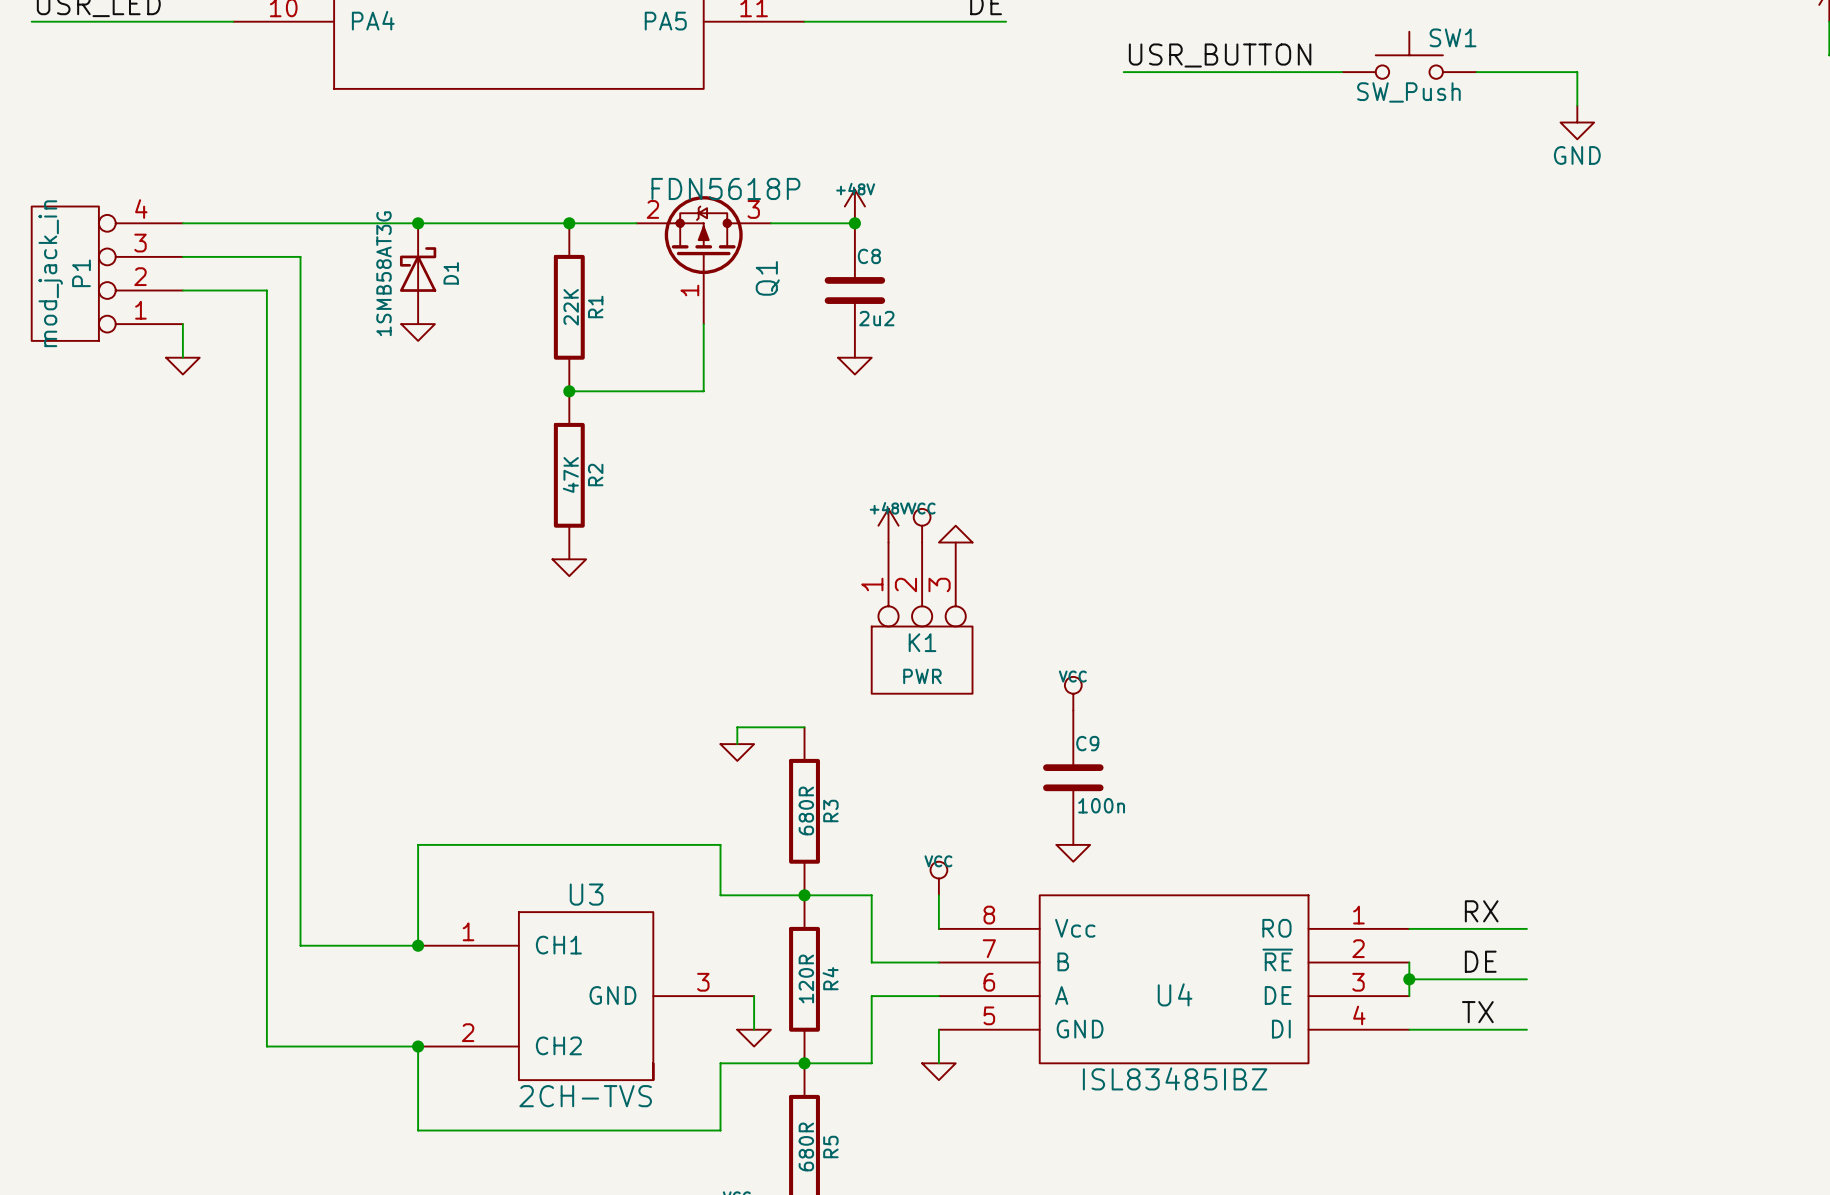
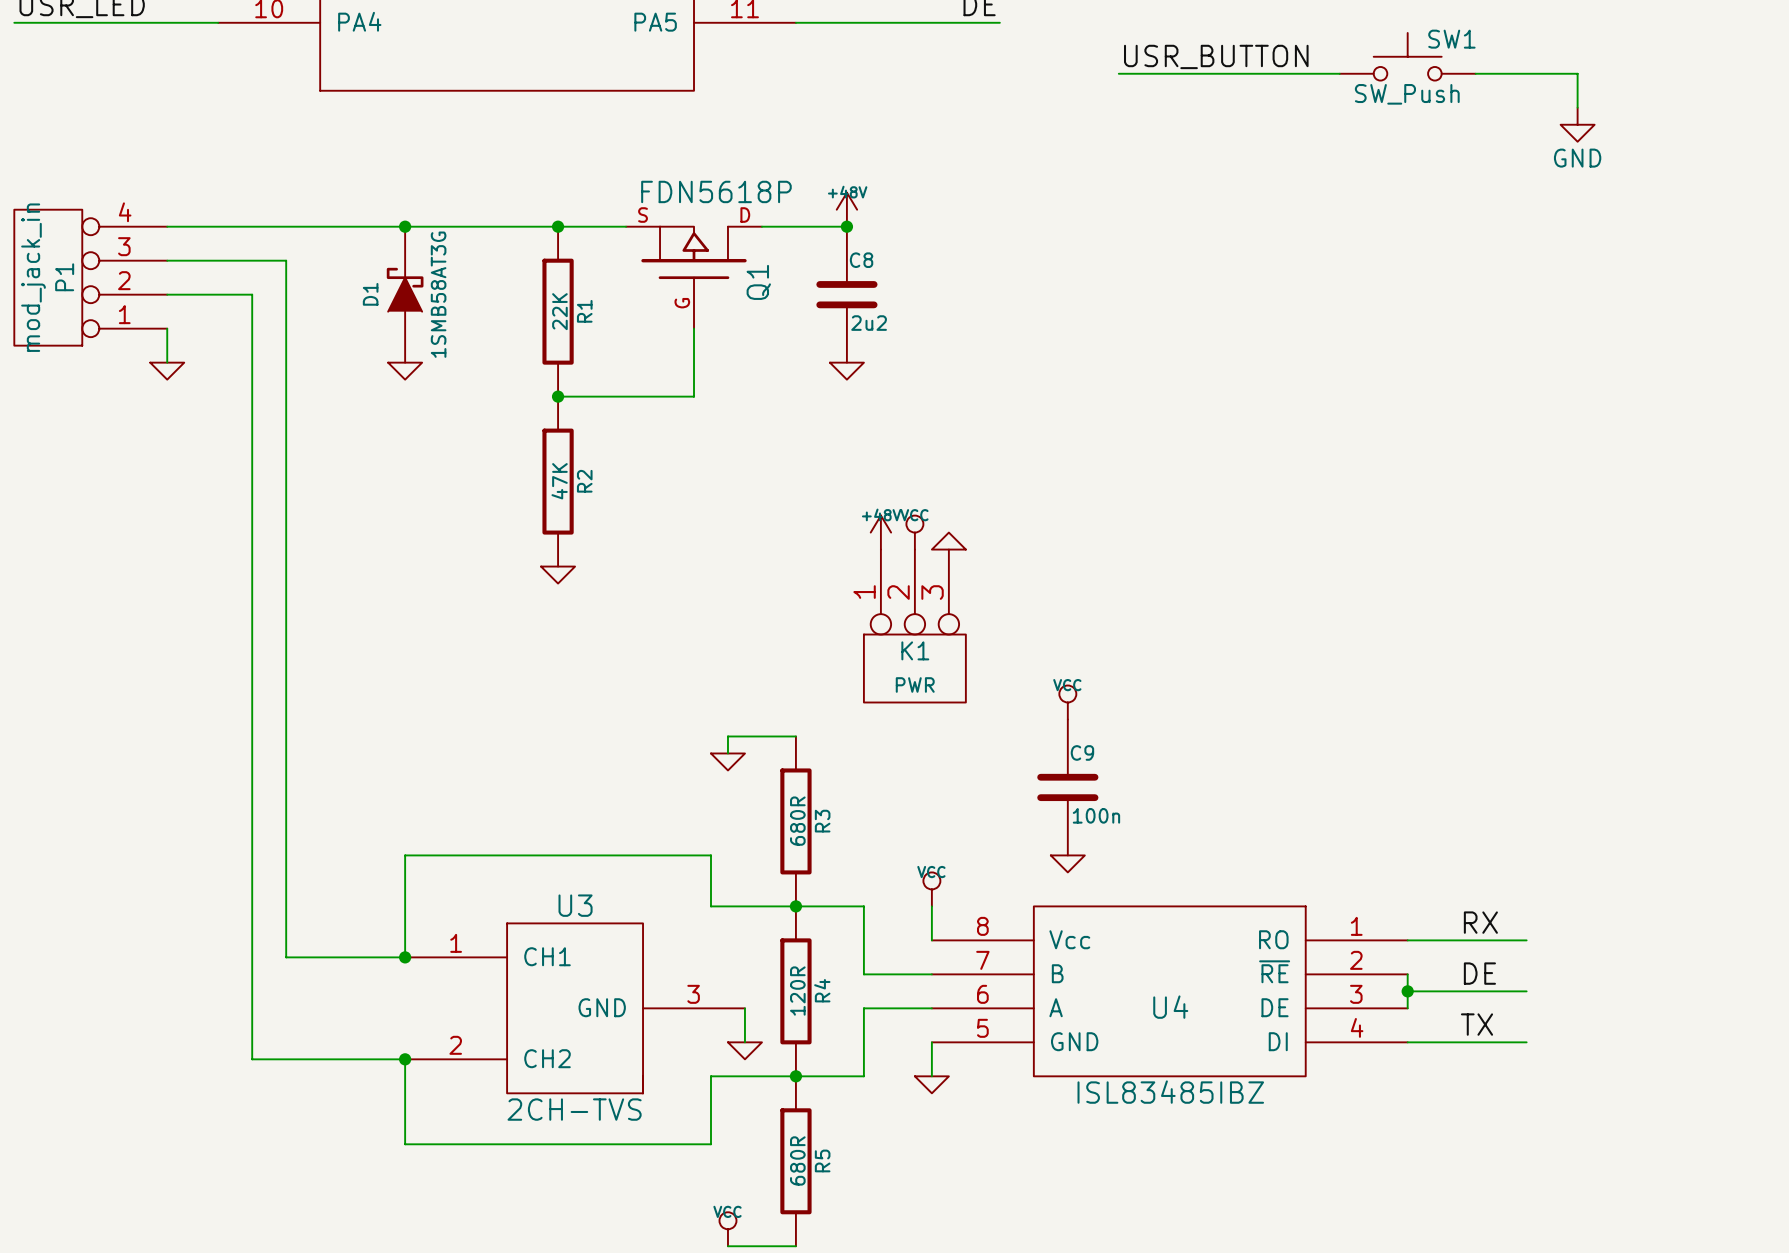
Q1 symbol: [636, 196, 771, 325] -> [626, 226, 762, 329]
D1 symbol: [399, 223, 437, 325] -> [386, 226, 424, 363]
D1 value position: 1SMB58AT3G (384, 273) -> 1SMB58AT3G (438, 294)
D1 name position: D1 (451, 273) -> D1 (370, 294)
power symbol position: (418, 332) -> (405, 371)

